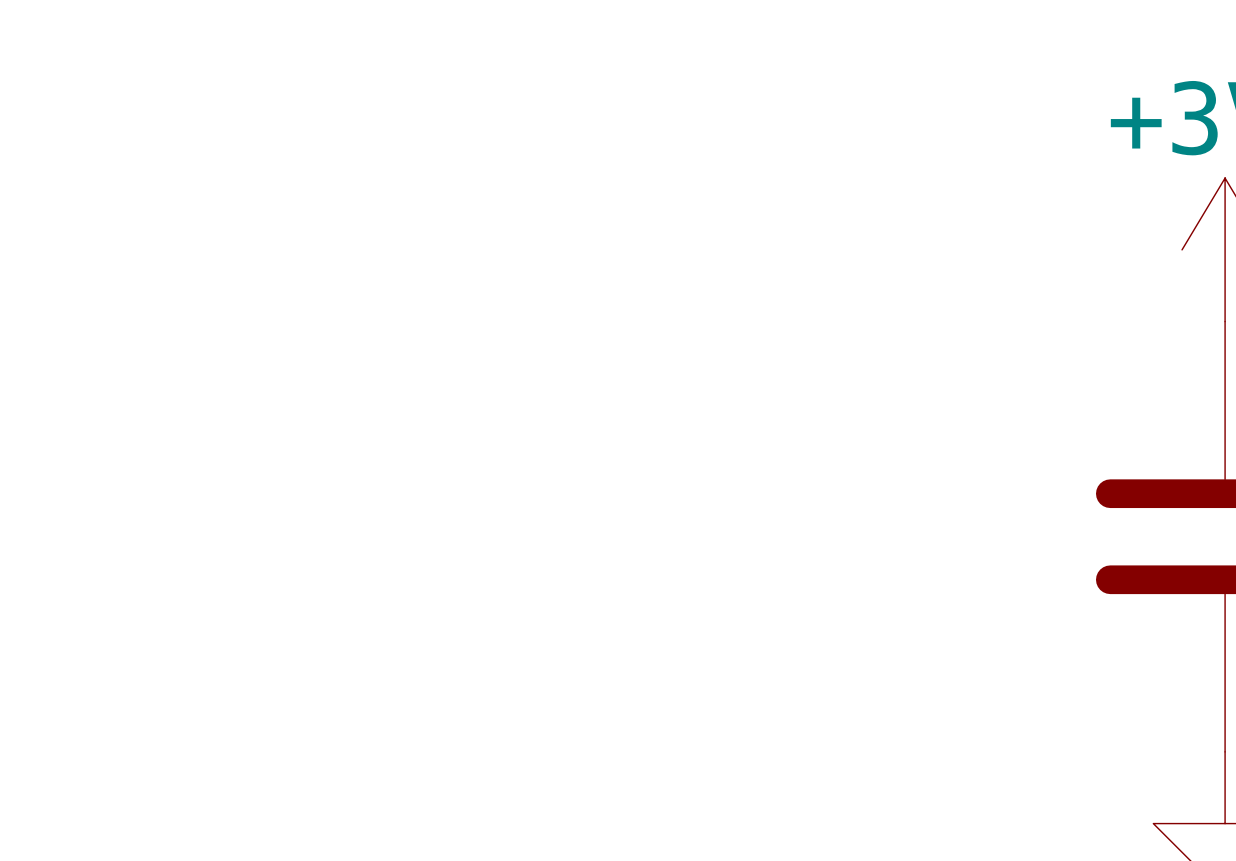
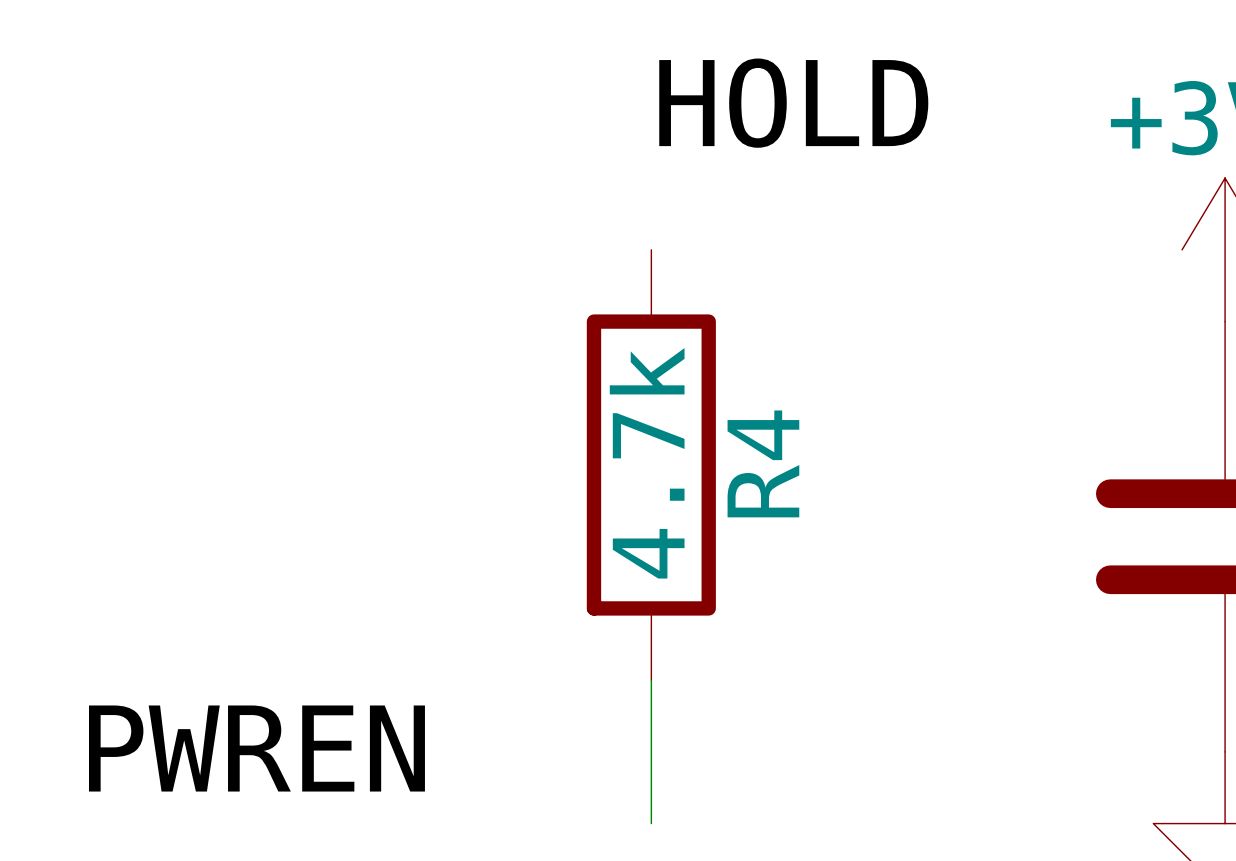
label: none -> HOLD (793, 103)
R4: none -> 4.7k (651, 465)
wire: none -> (651, 680) (651, 823)
label: none -> PWREN (256, 748)

